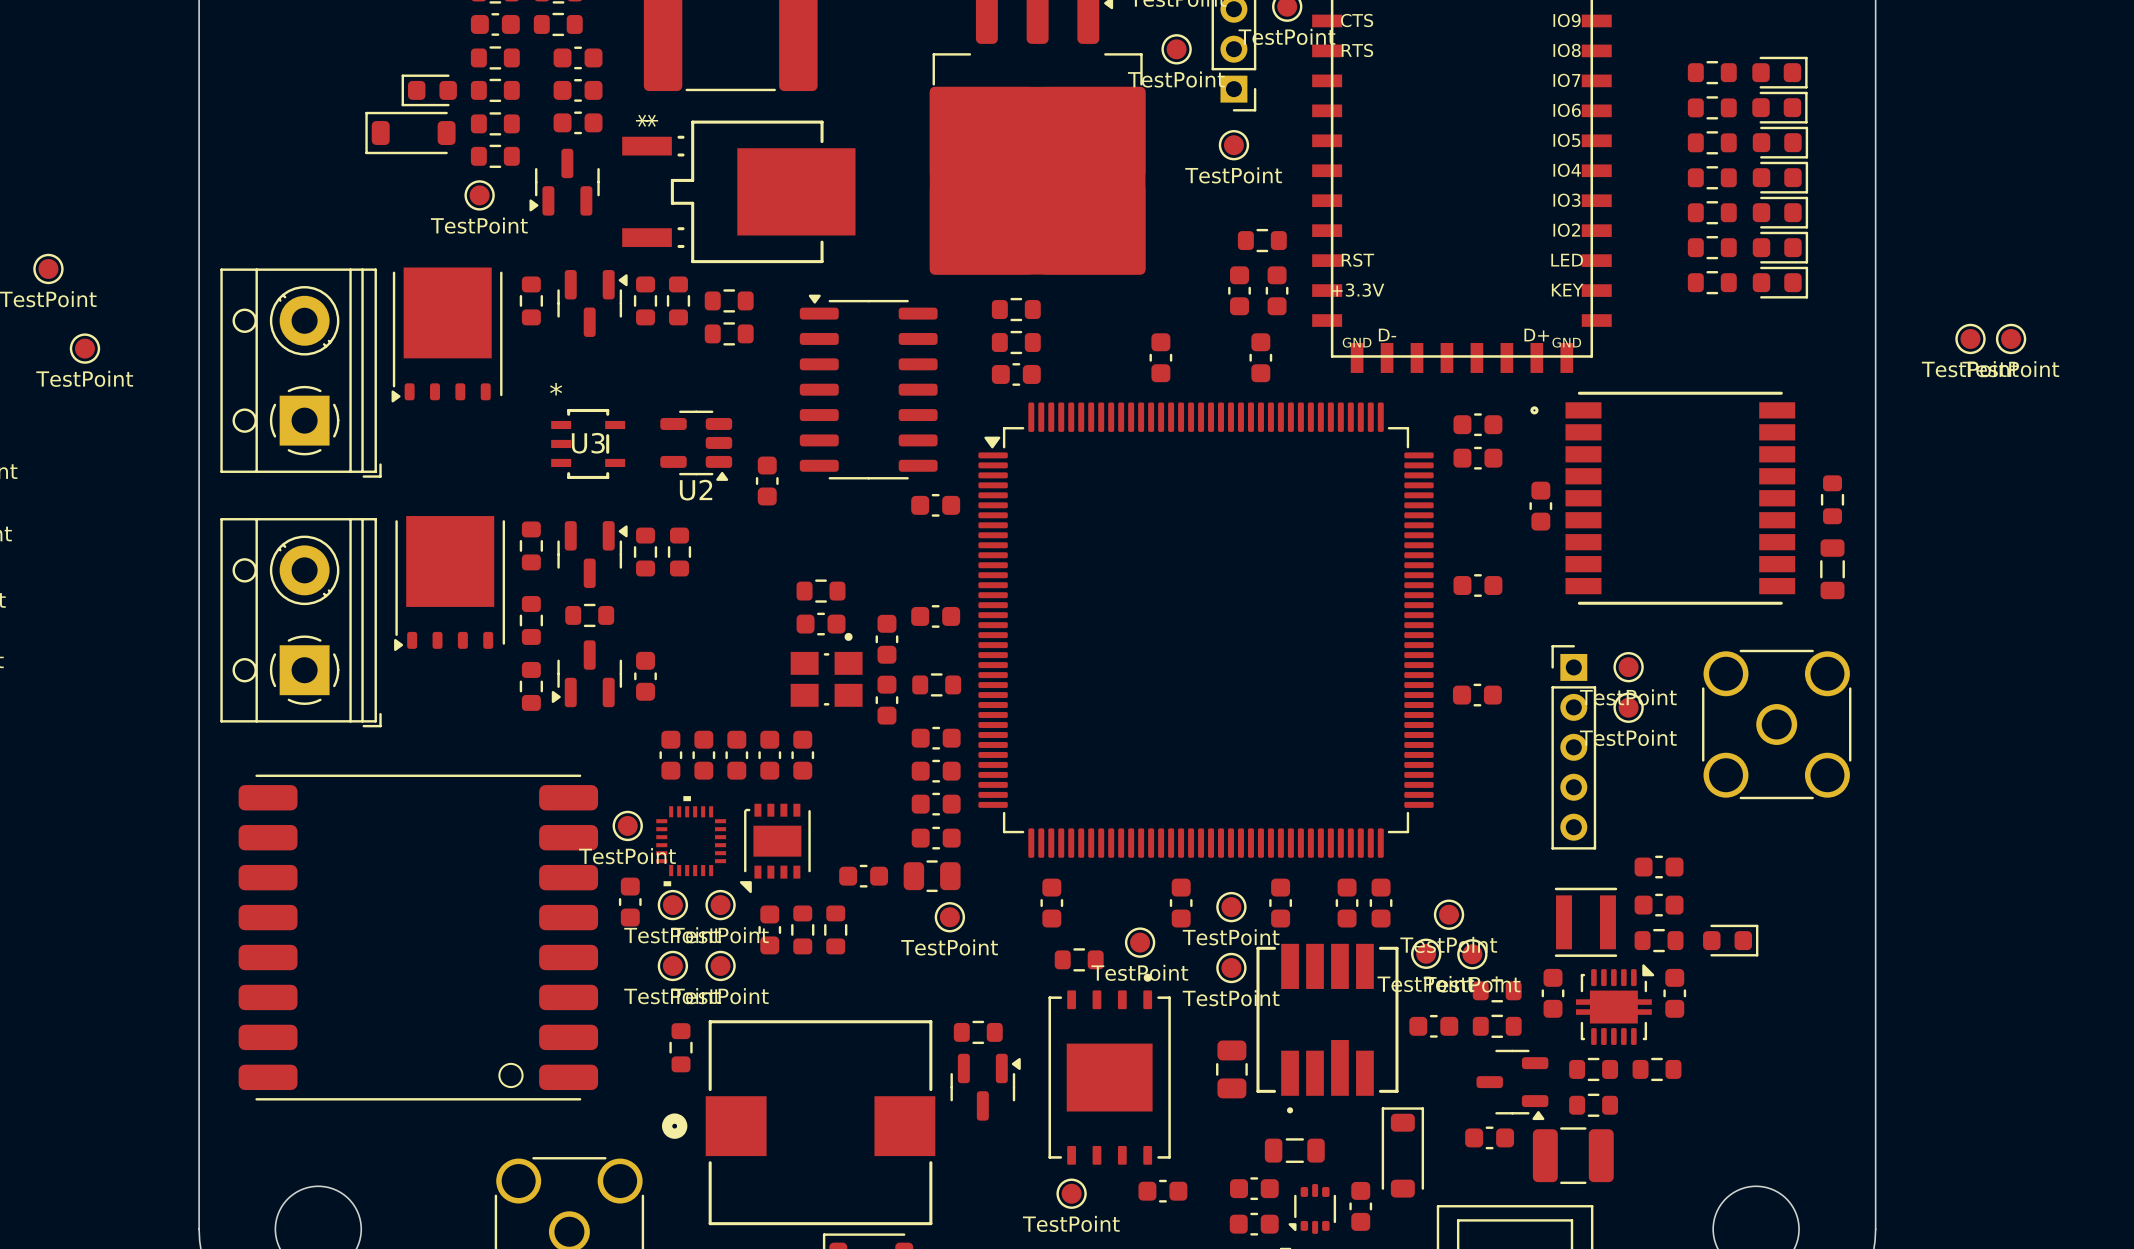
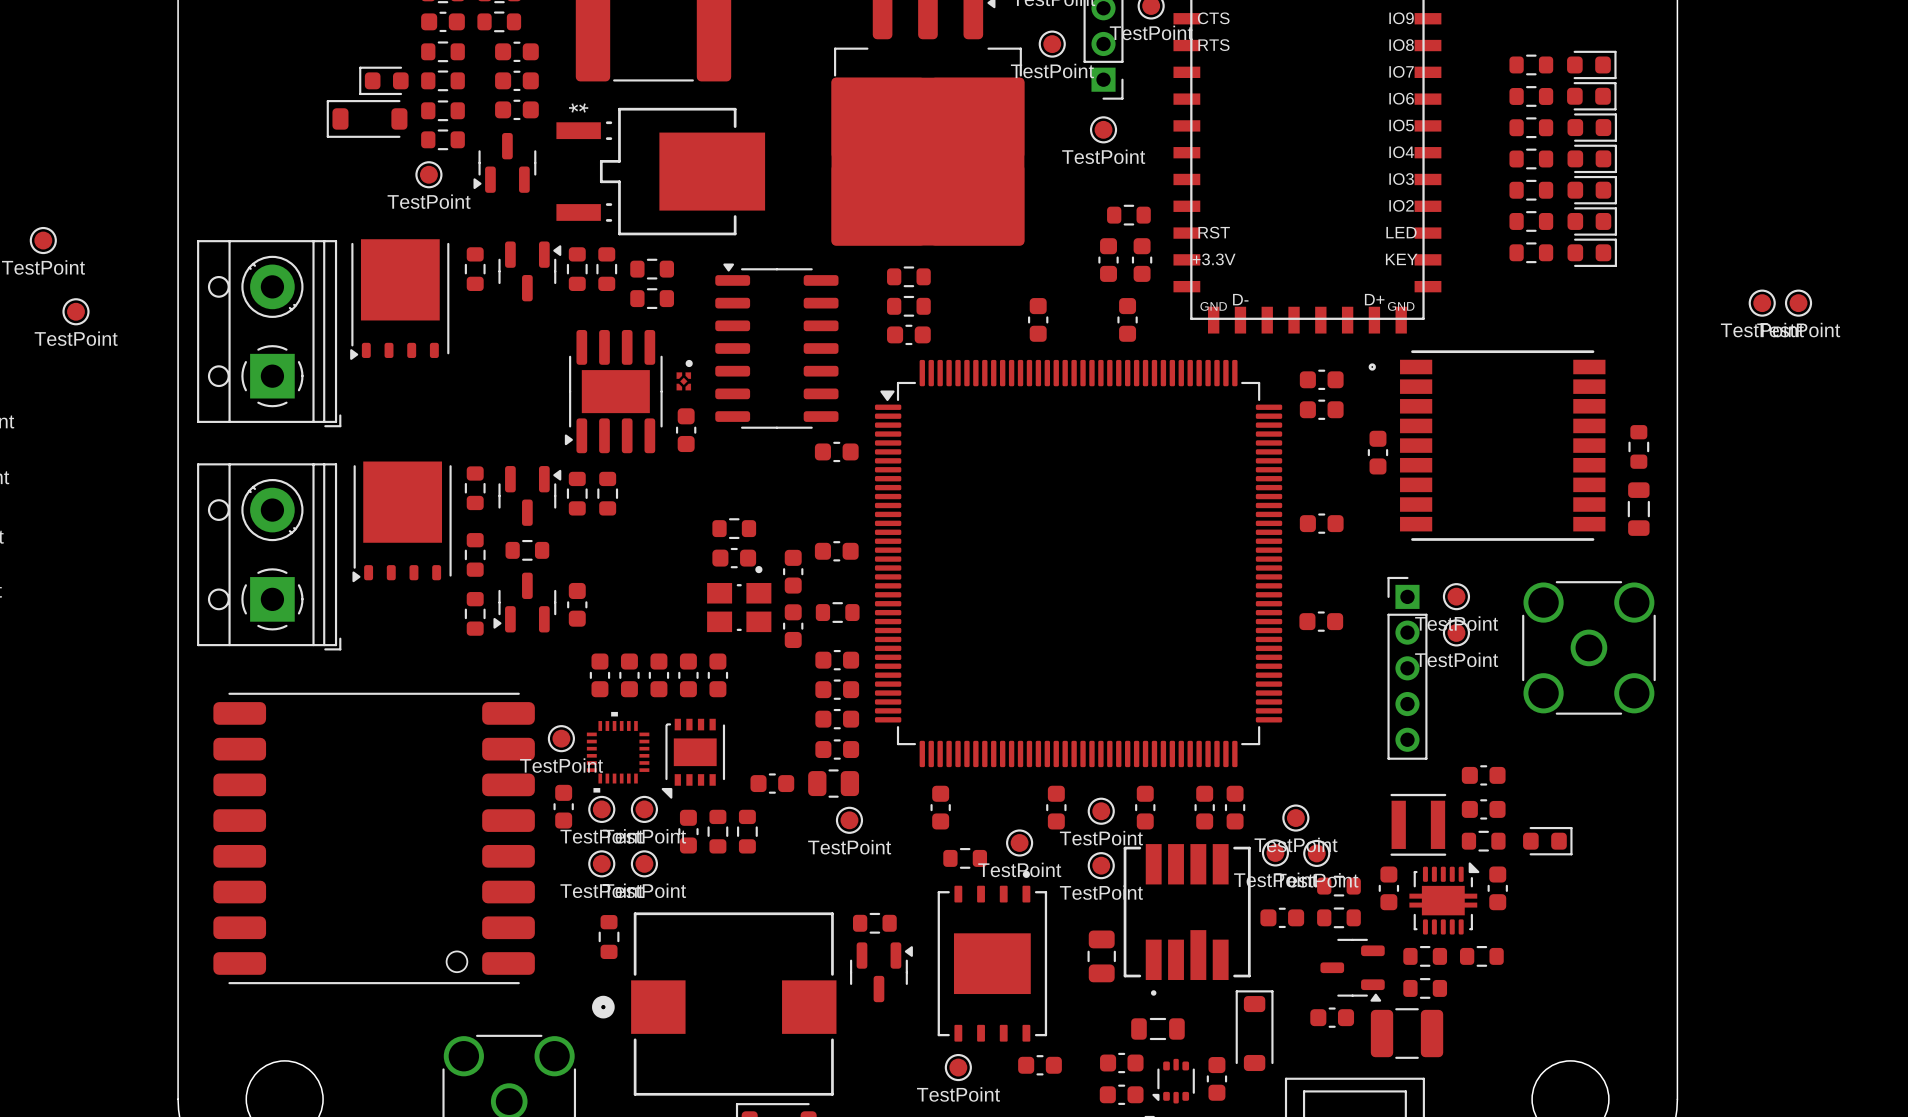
part: none -> (684, 375)
part: none -> (613, 391)
U3: (588, 443) -> none
U2: (696, 445) -> none

